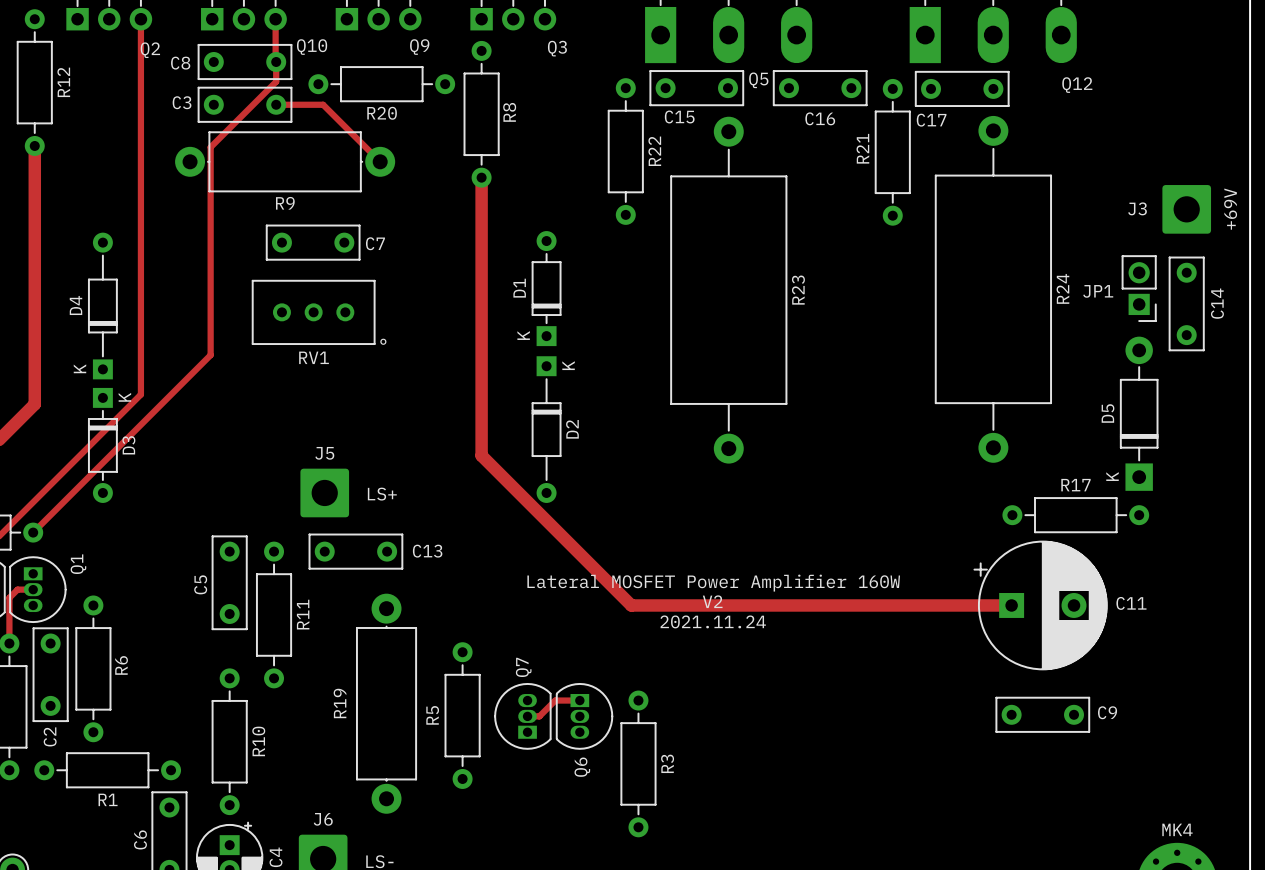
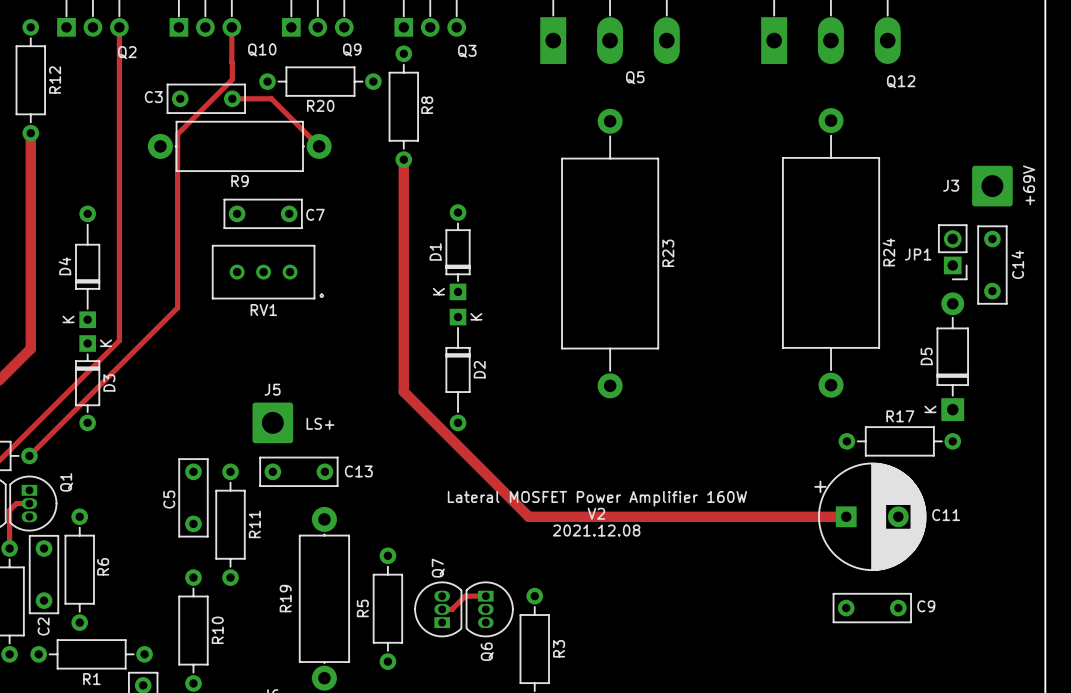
C8: (245, 61) -> none
C15: (696, 88) -> none
C16: (820, 88) -> none
C17: (962, 88) -> none
R22: (625, 151) -> none
R21: (892, 152) -> none
text: 2021.11.24 (713, 621) -> 2021.12.08 (596, 530)

